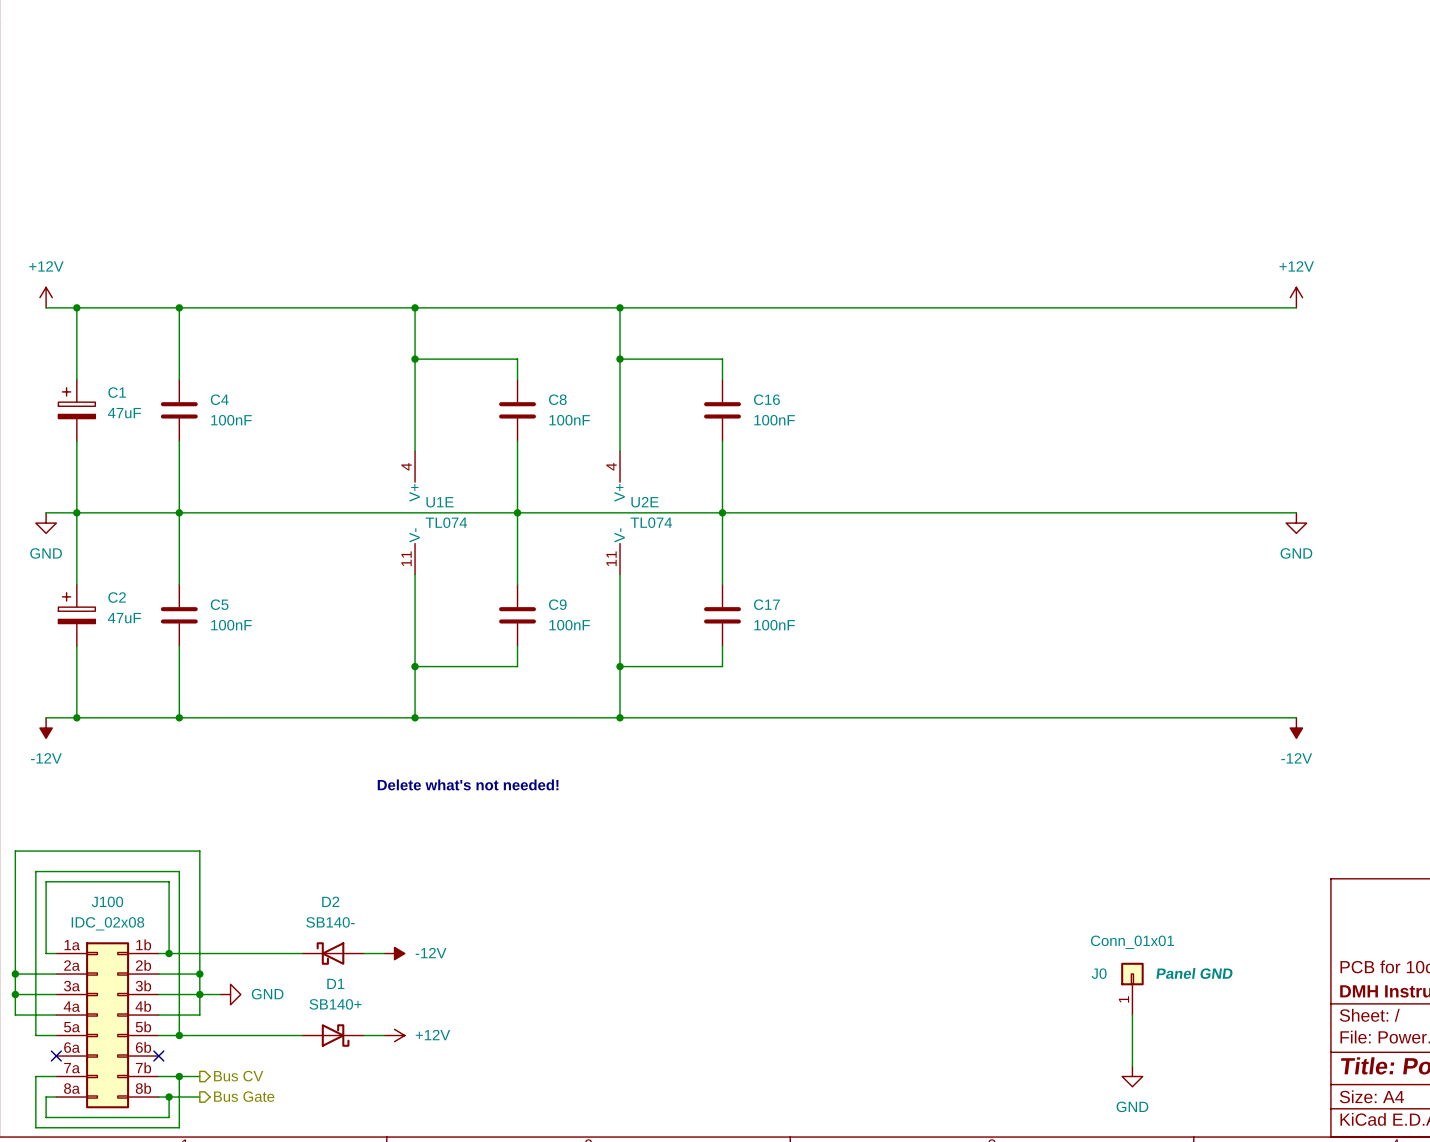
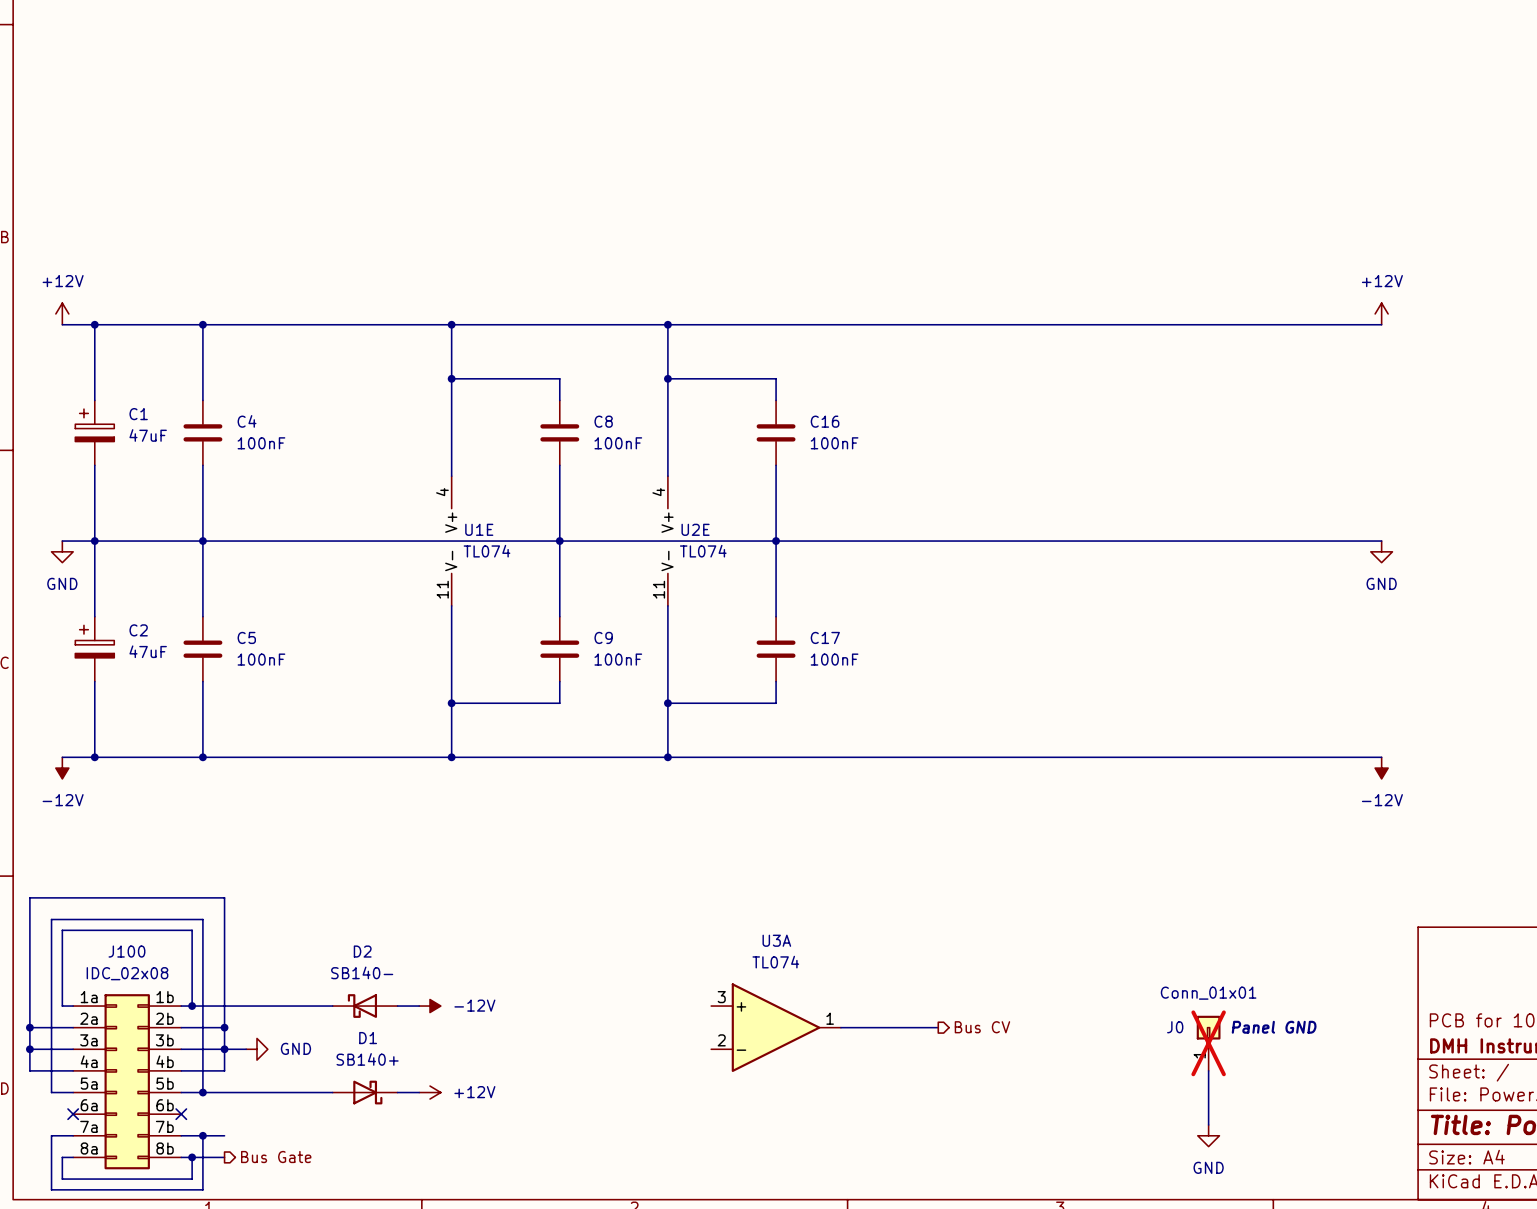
text: Delete what's not needed! (468, 784) -> none
hierarchical label: none -> Bus CV (982, 1027)
U3A: none -> TL074 (776, 1027)
wire: none -> (840, 1027) (938, 1027)
J0 do-not-place cross: none -> (1208, 1043)
hierarchical label: Bus CV (238, 1076) -> none

